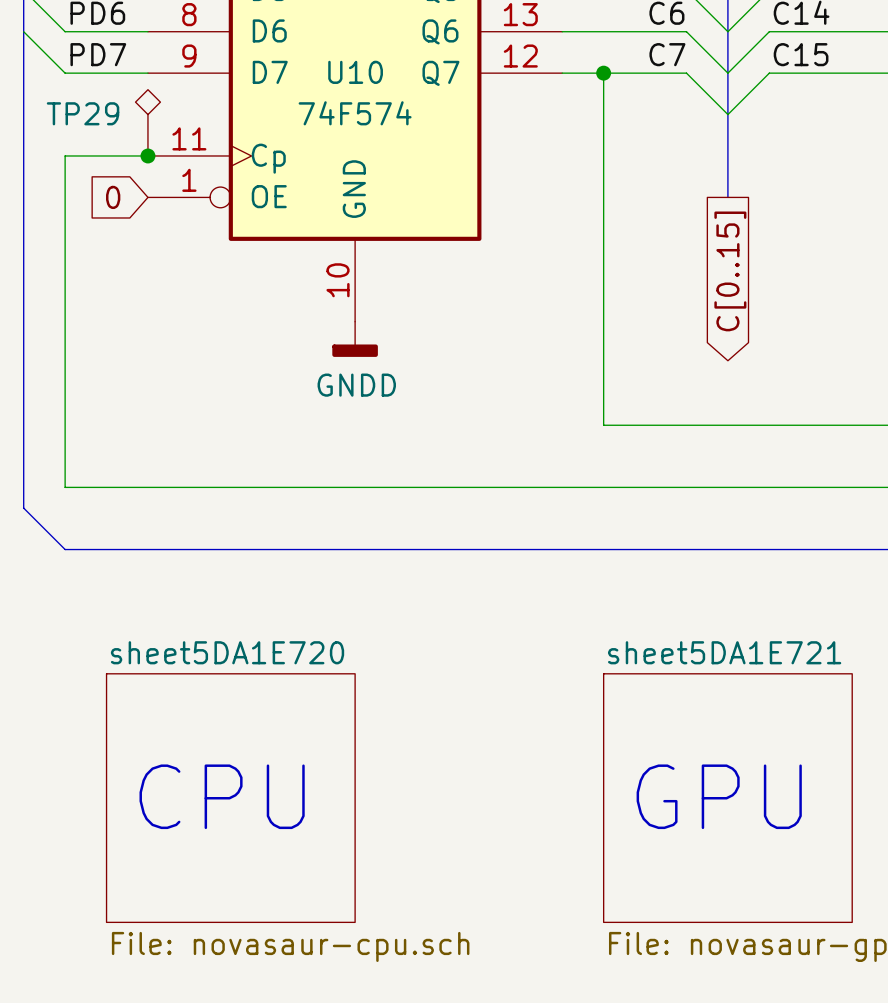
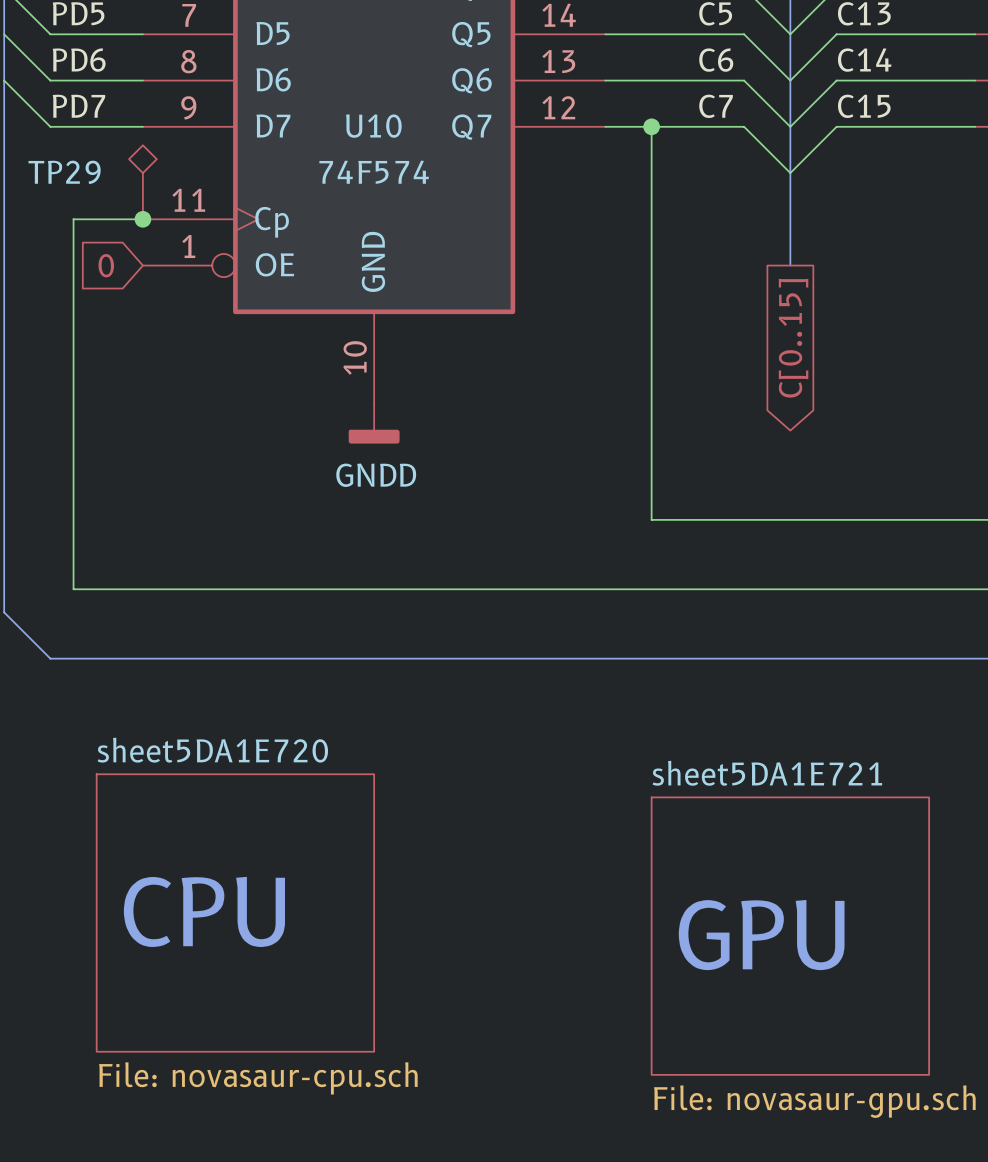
wire: (85, 155) (65, 155) (65, 487) (85, 487) -> (73, 219) (73, 589)
text position: CPU (222, 796) -> CPU (204, 911)
sheet sheet5DA1E720 position: (230, 798) -> (235, 913)

